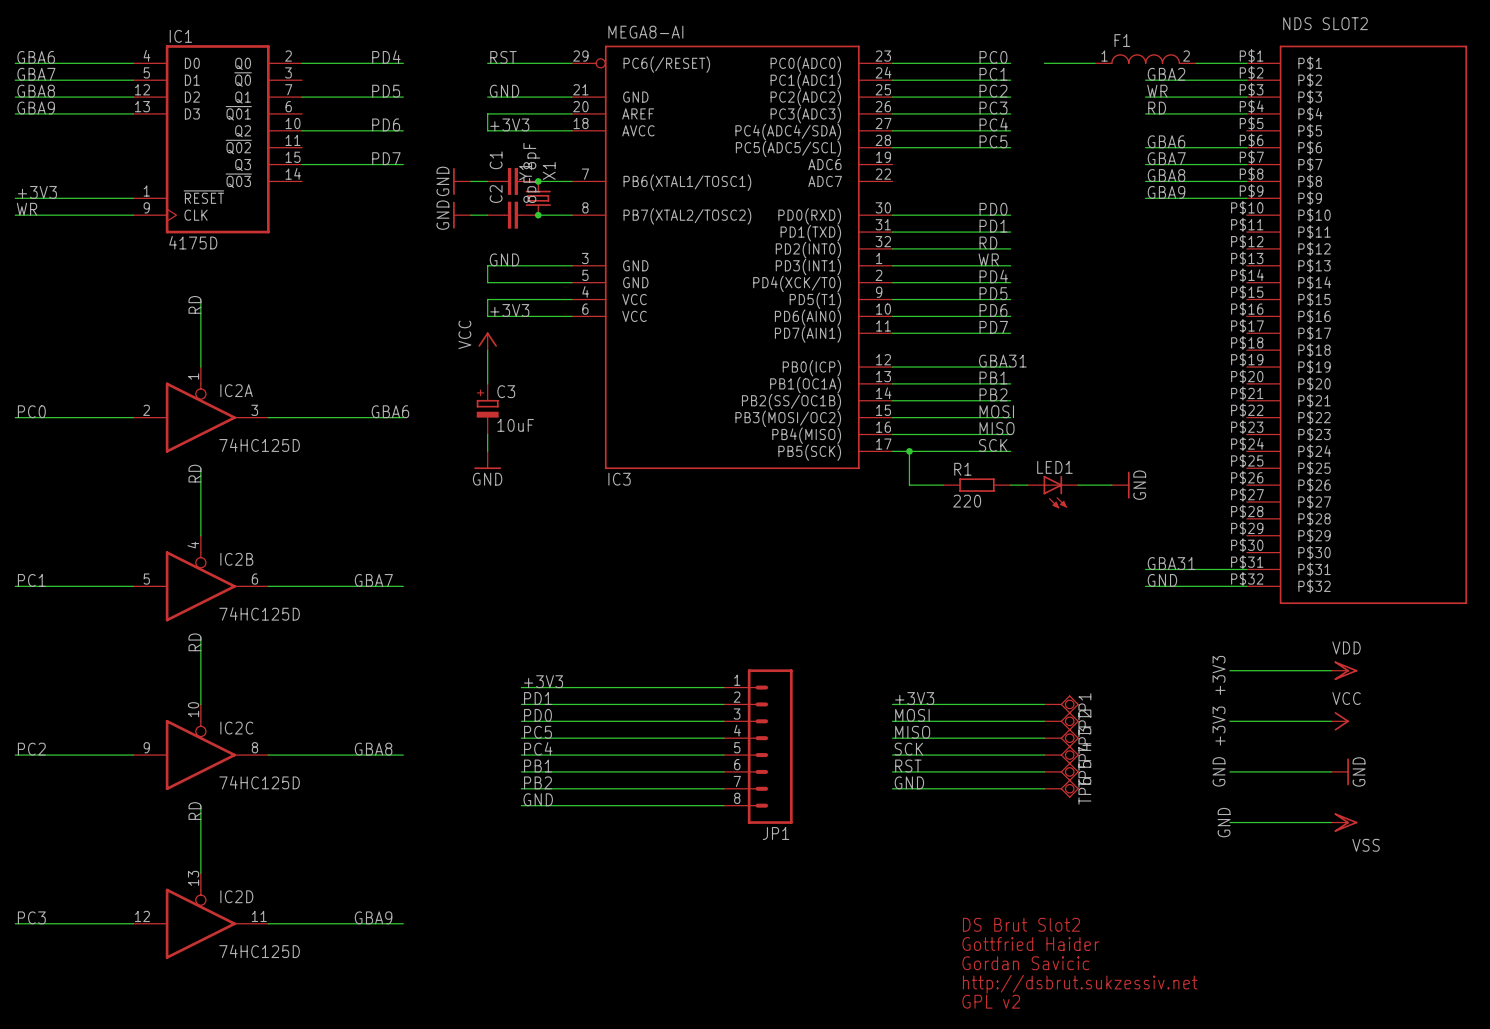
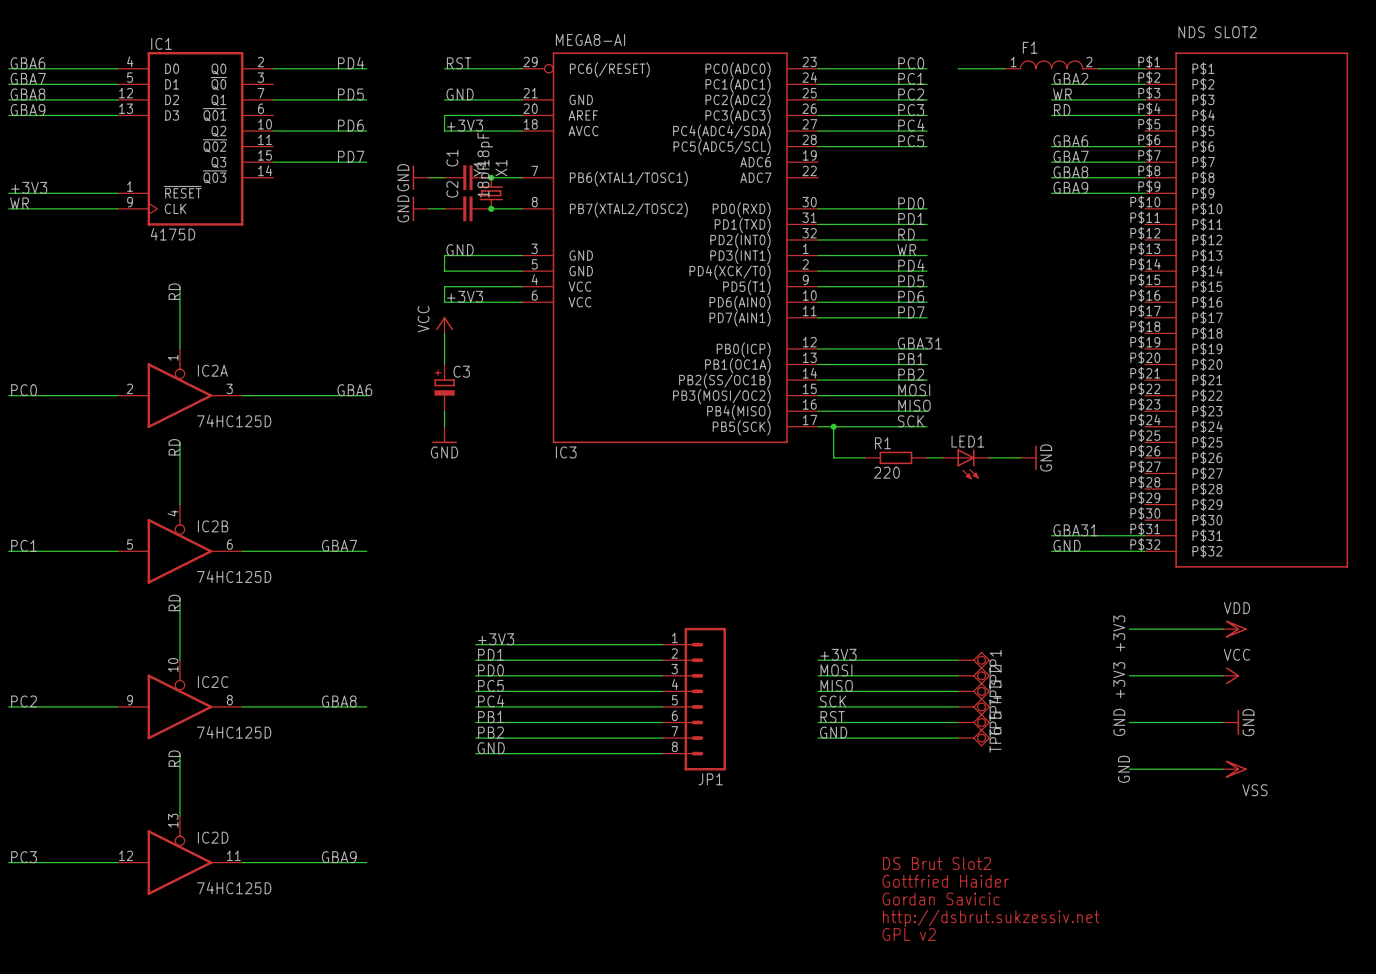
C1 value: 8pF (531, 156) -> 18pF (485, 149)
C2 value: 8pF (531, 189) -> 18pF (485, 180)
C3 value: 10uF (515, 425) -> none

